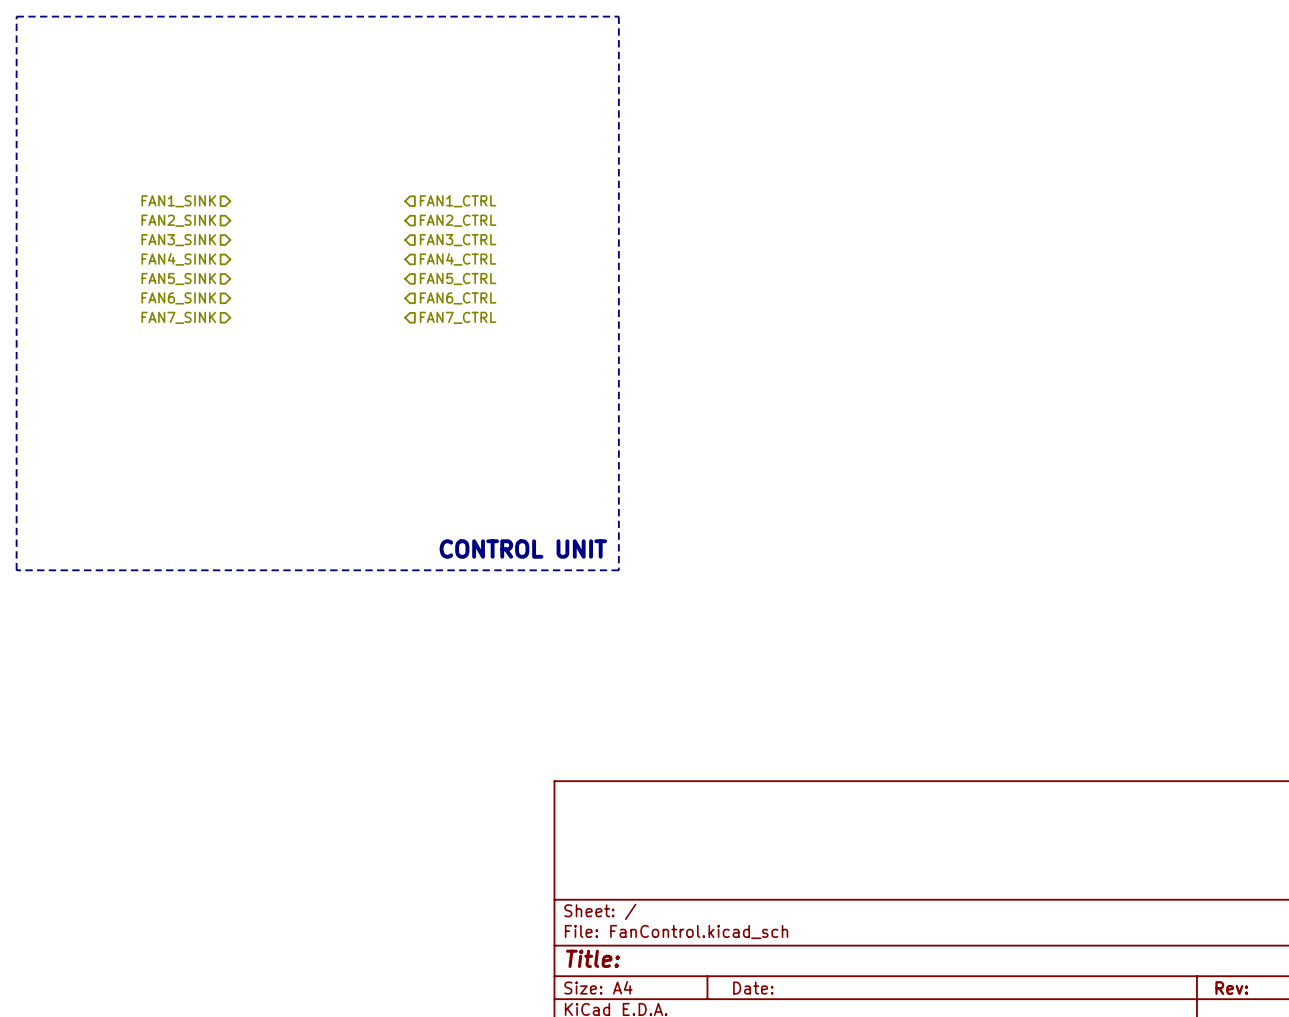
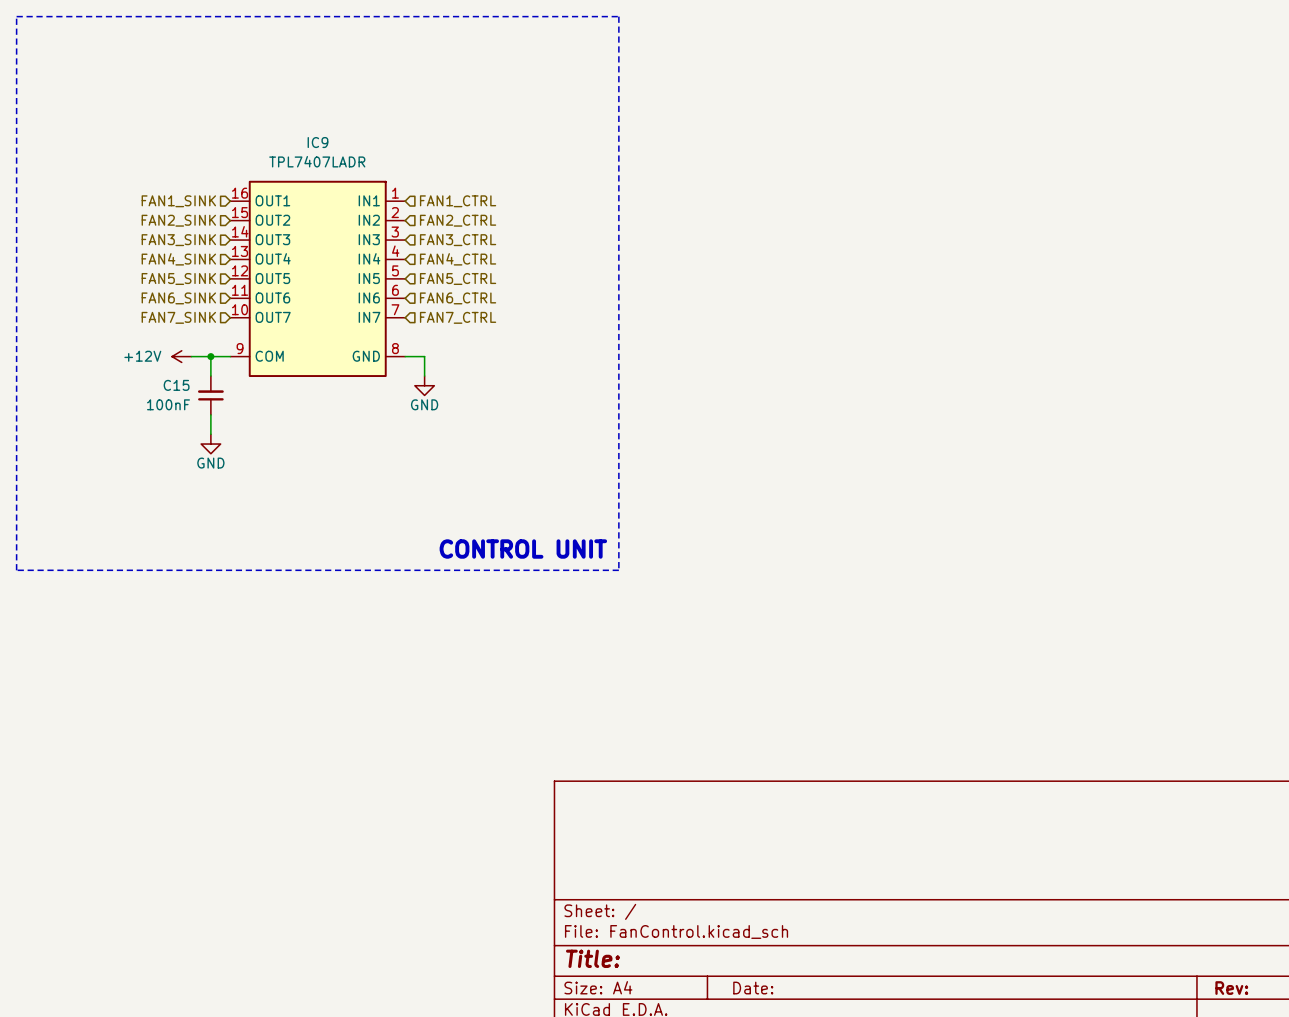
IC9: none -> TPL7407LADR (317, 278)
power symbol: none -> +12V (181, 356)
wire: none -> (191, 356) (230, 356)
wire: none -> (210, 356) (210, 376)
junction: none -> (210, 356)
wire: none -> (405, 356) (424, 356) (424, 376)
power symbol: none -> GND (424, 385)
C15: none -> 100nF (210, 395)
wire: none -> (210, 414) (210, 434)
power symbol: none -> GND (210, 444)

